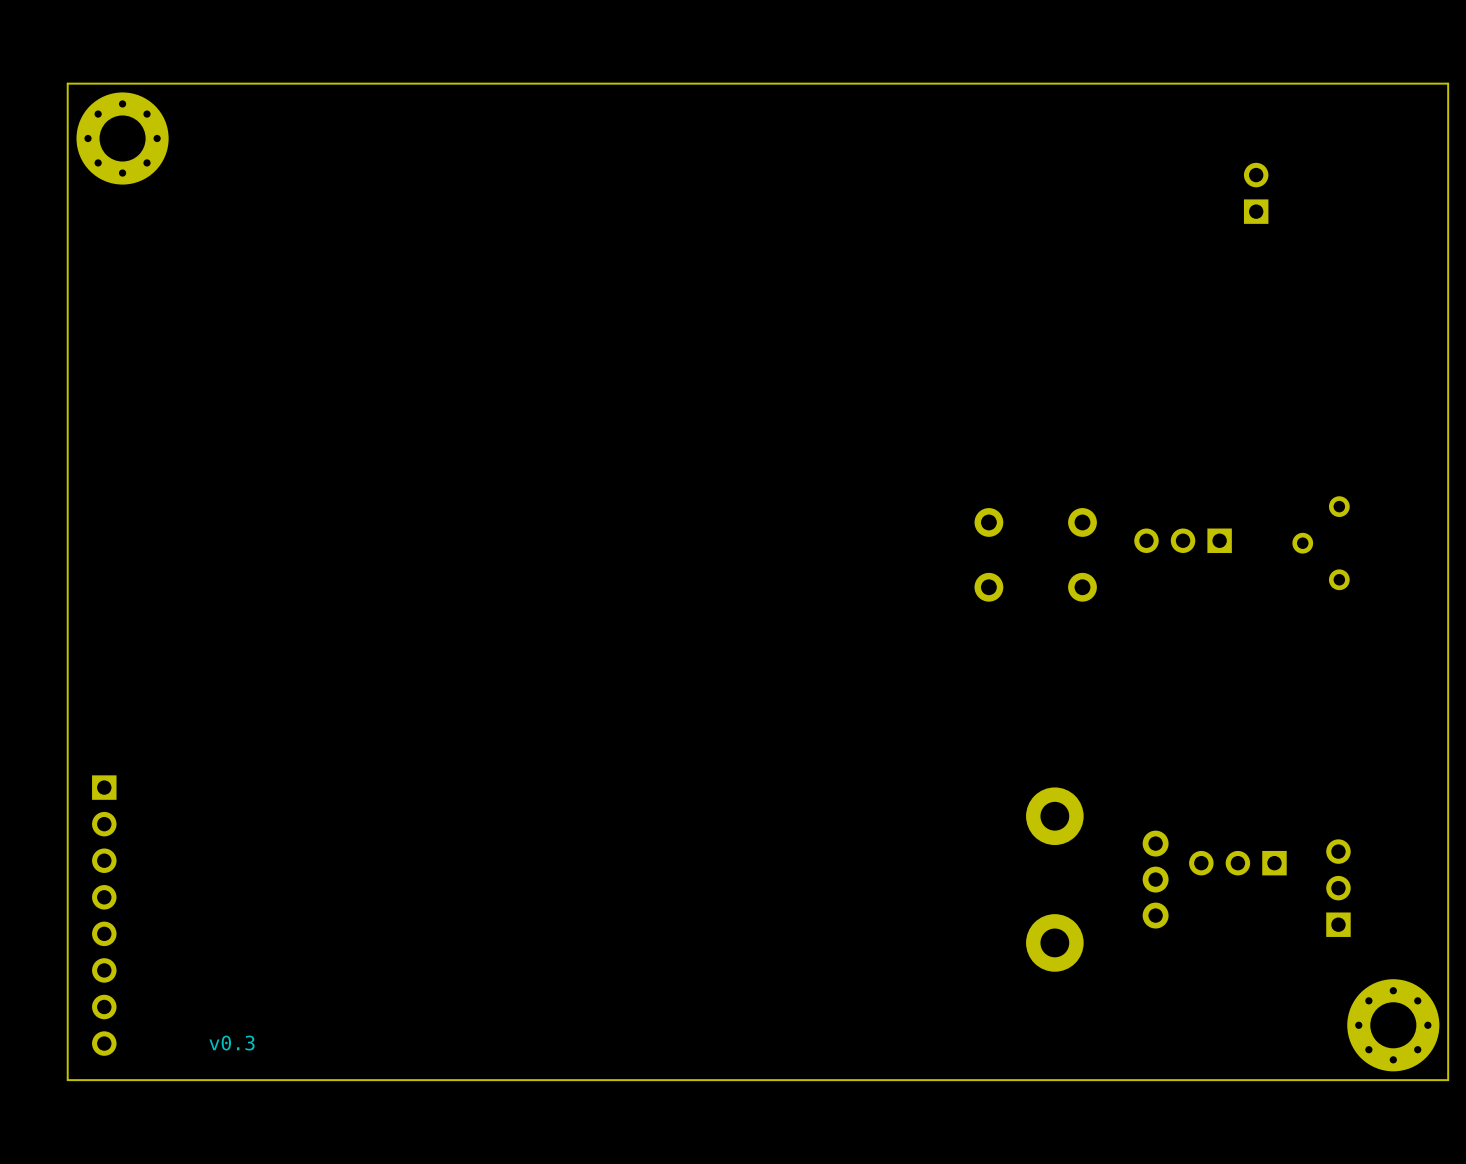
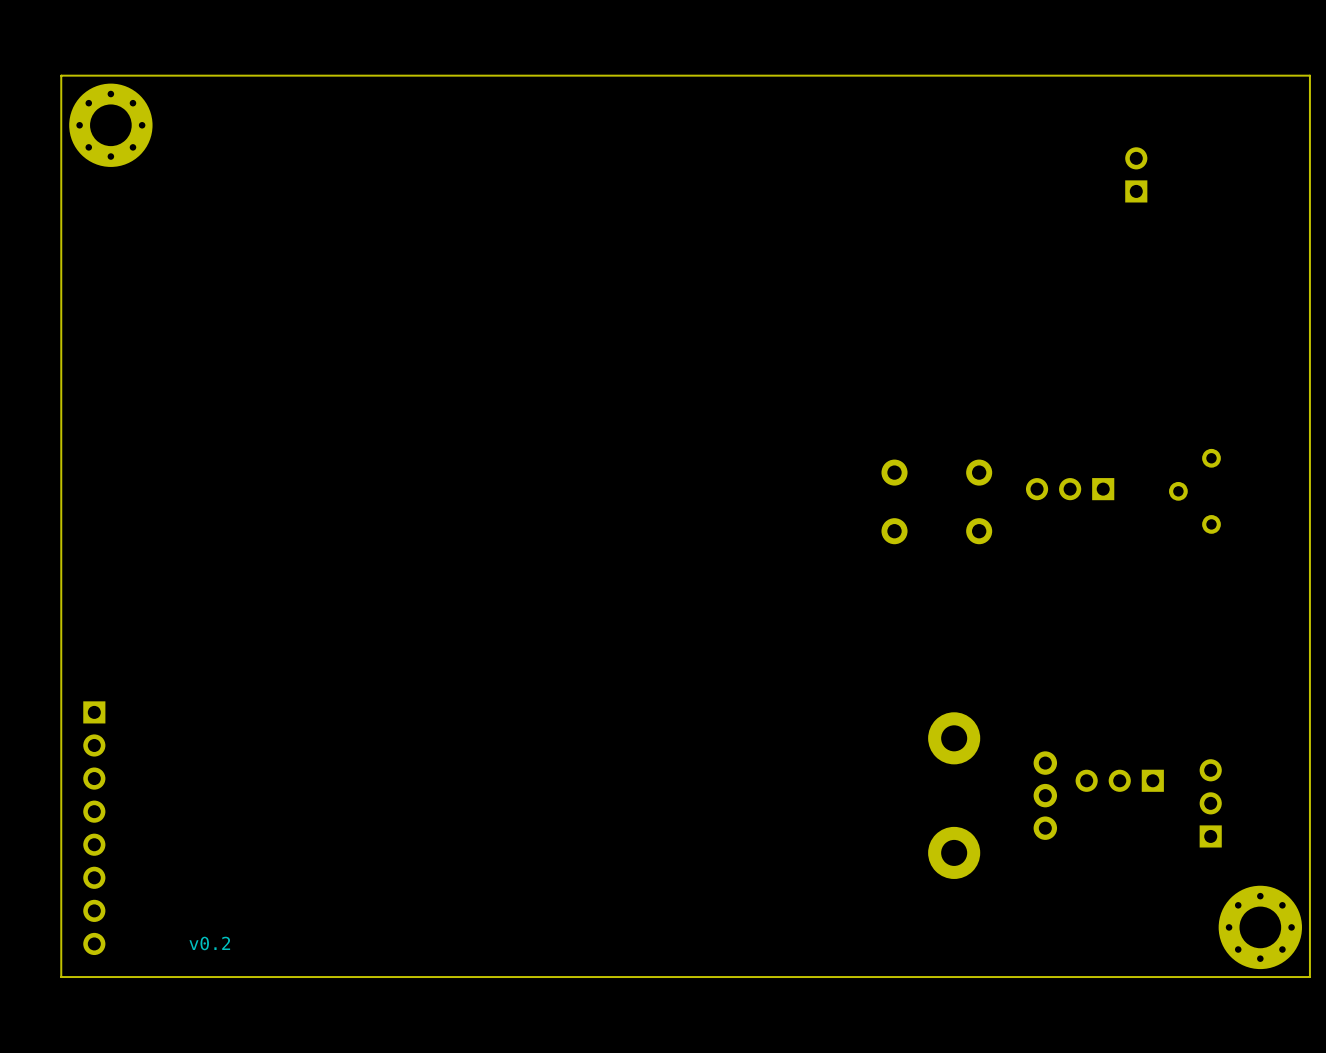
text: v0.3 (232, 1043) -> v0.2 (209, 943)

